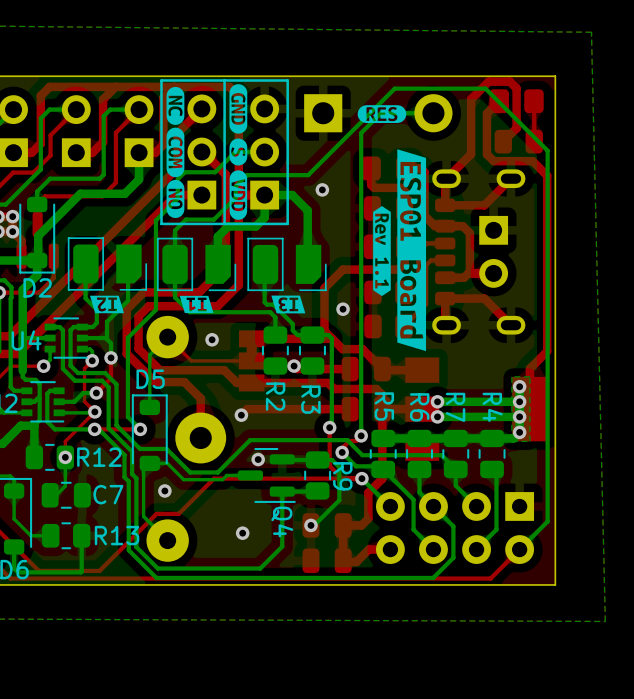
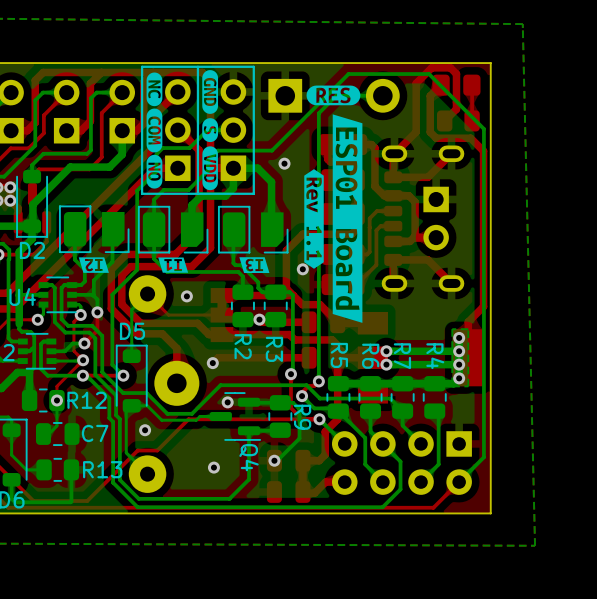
drawing shape: [357, 105, 407, 123] -> [306, 85, 361, 106]
drawing: none -> [304, 114, 363, 323]
drawing: [373, 149, 427, 352] -> none

